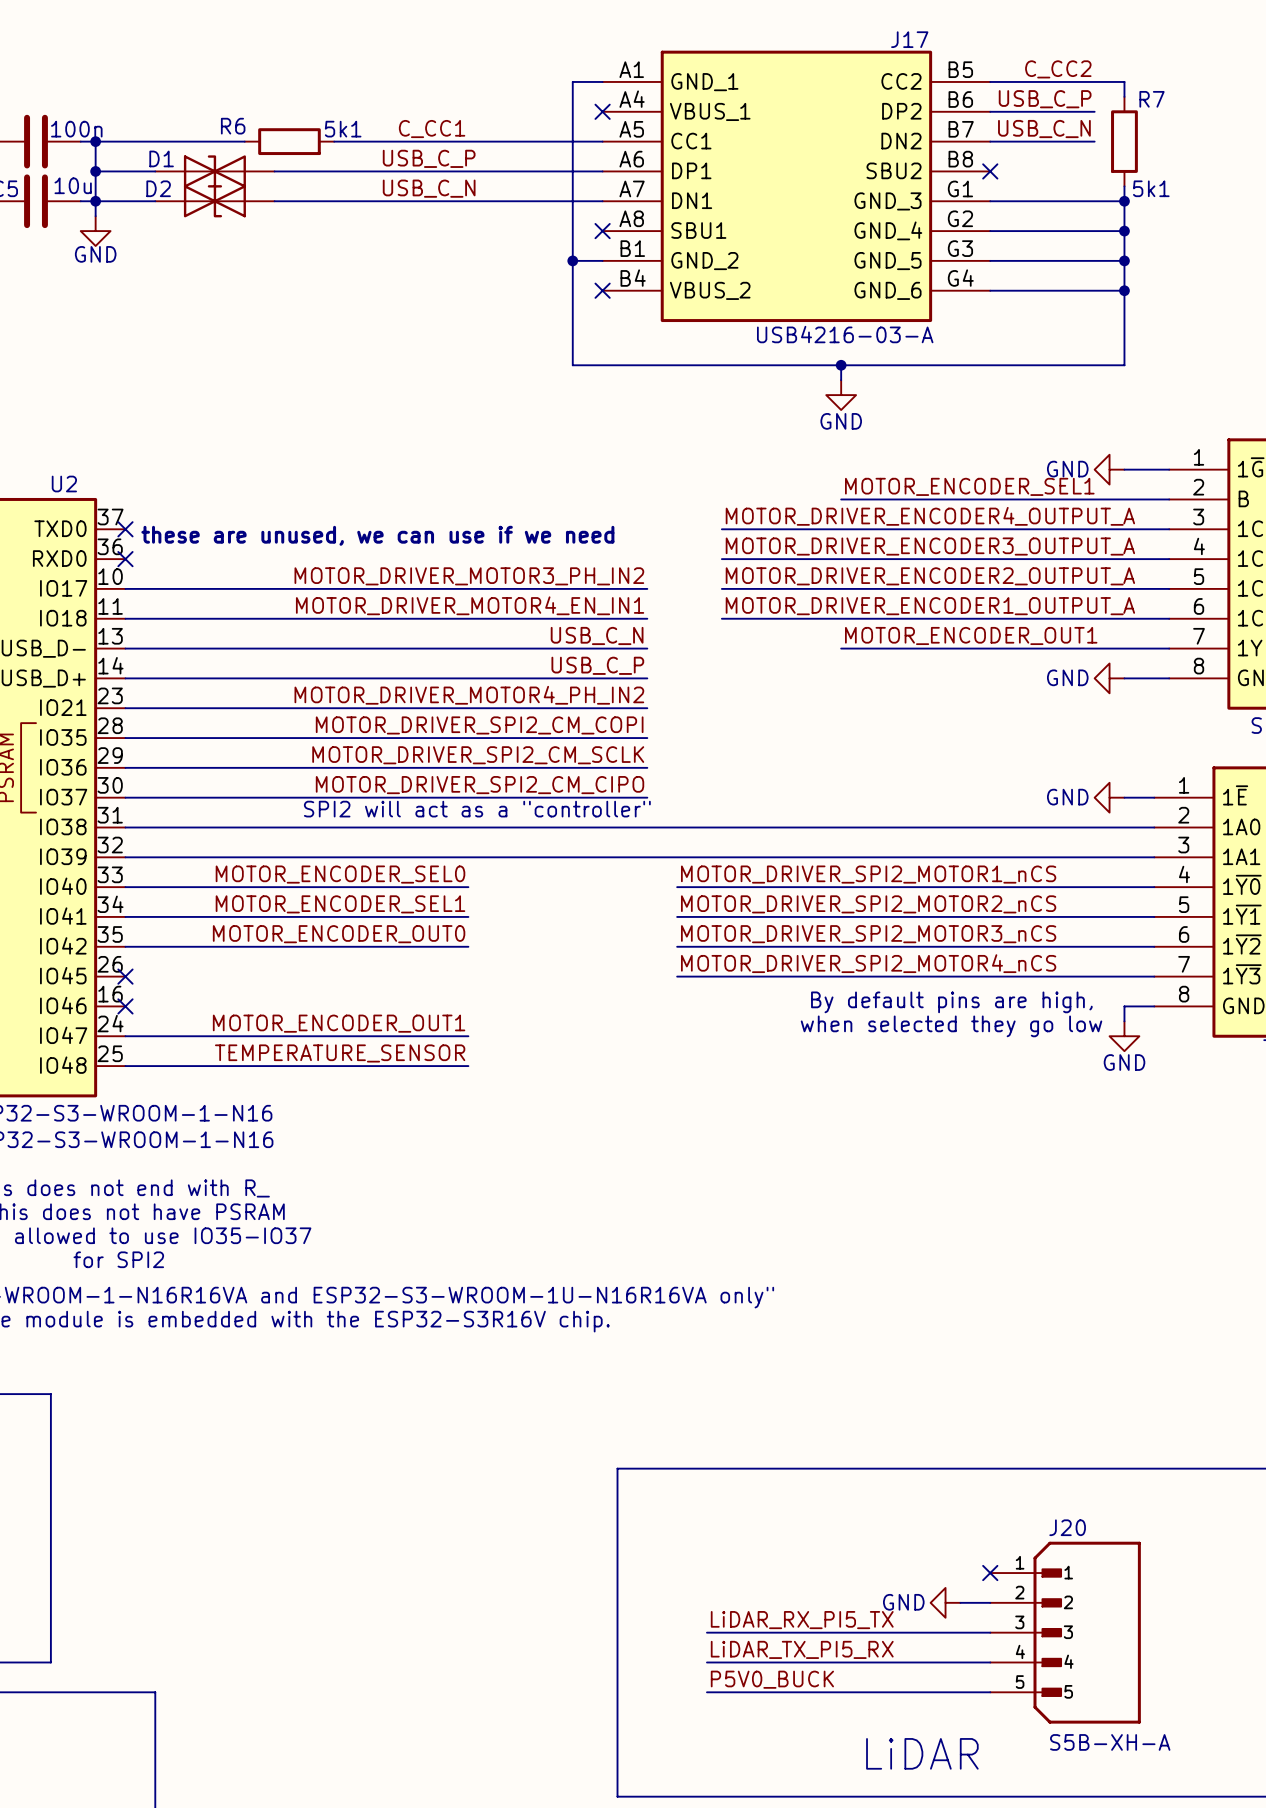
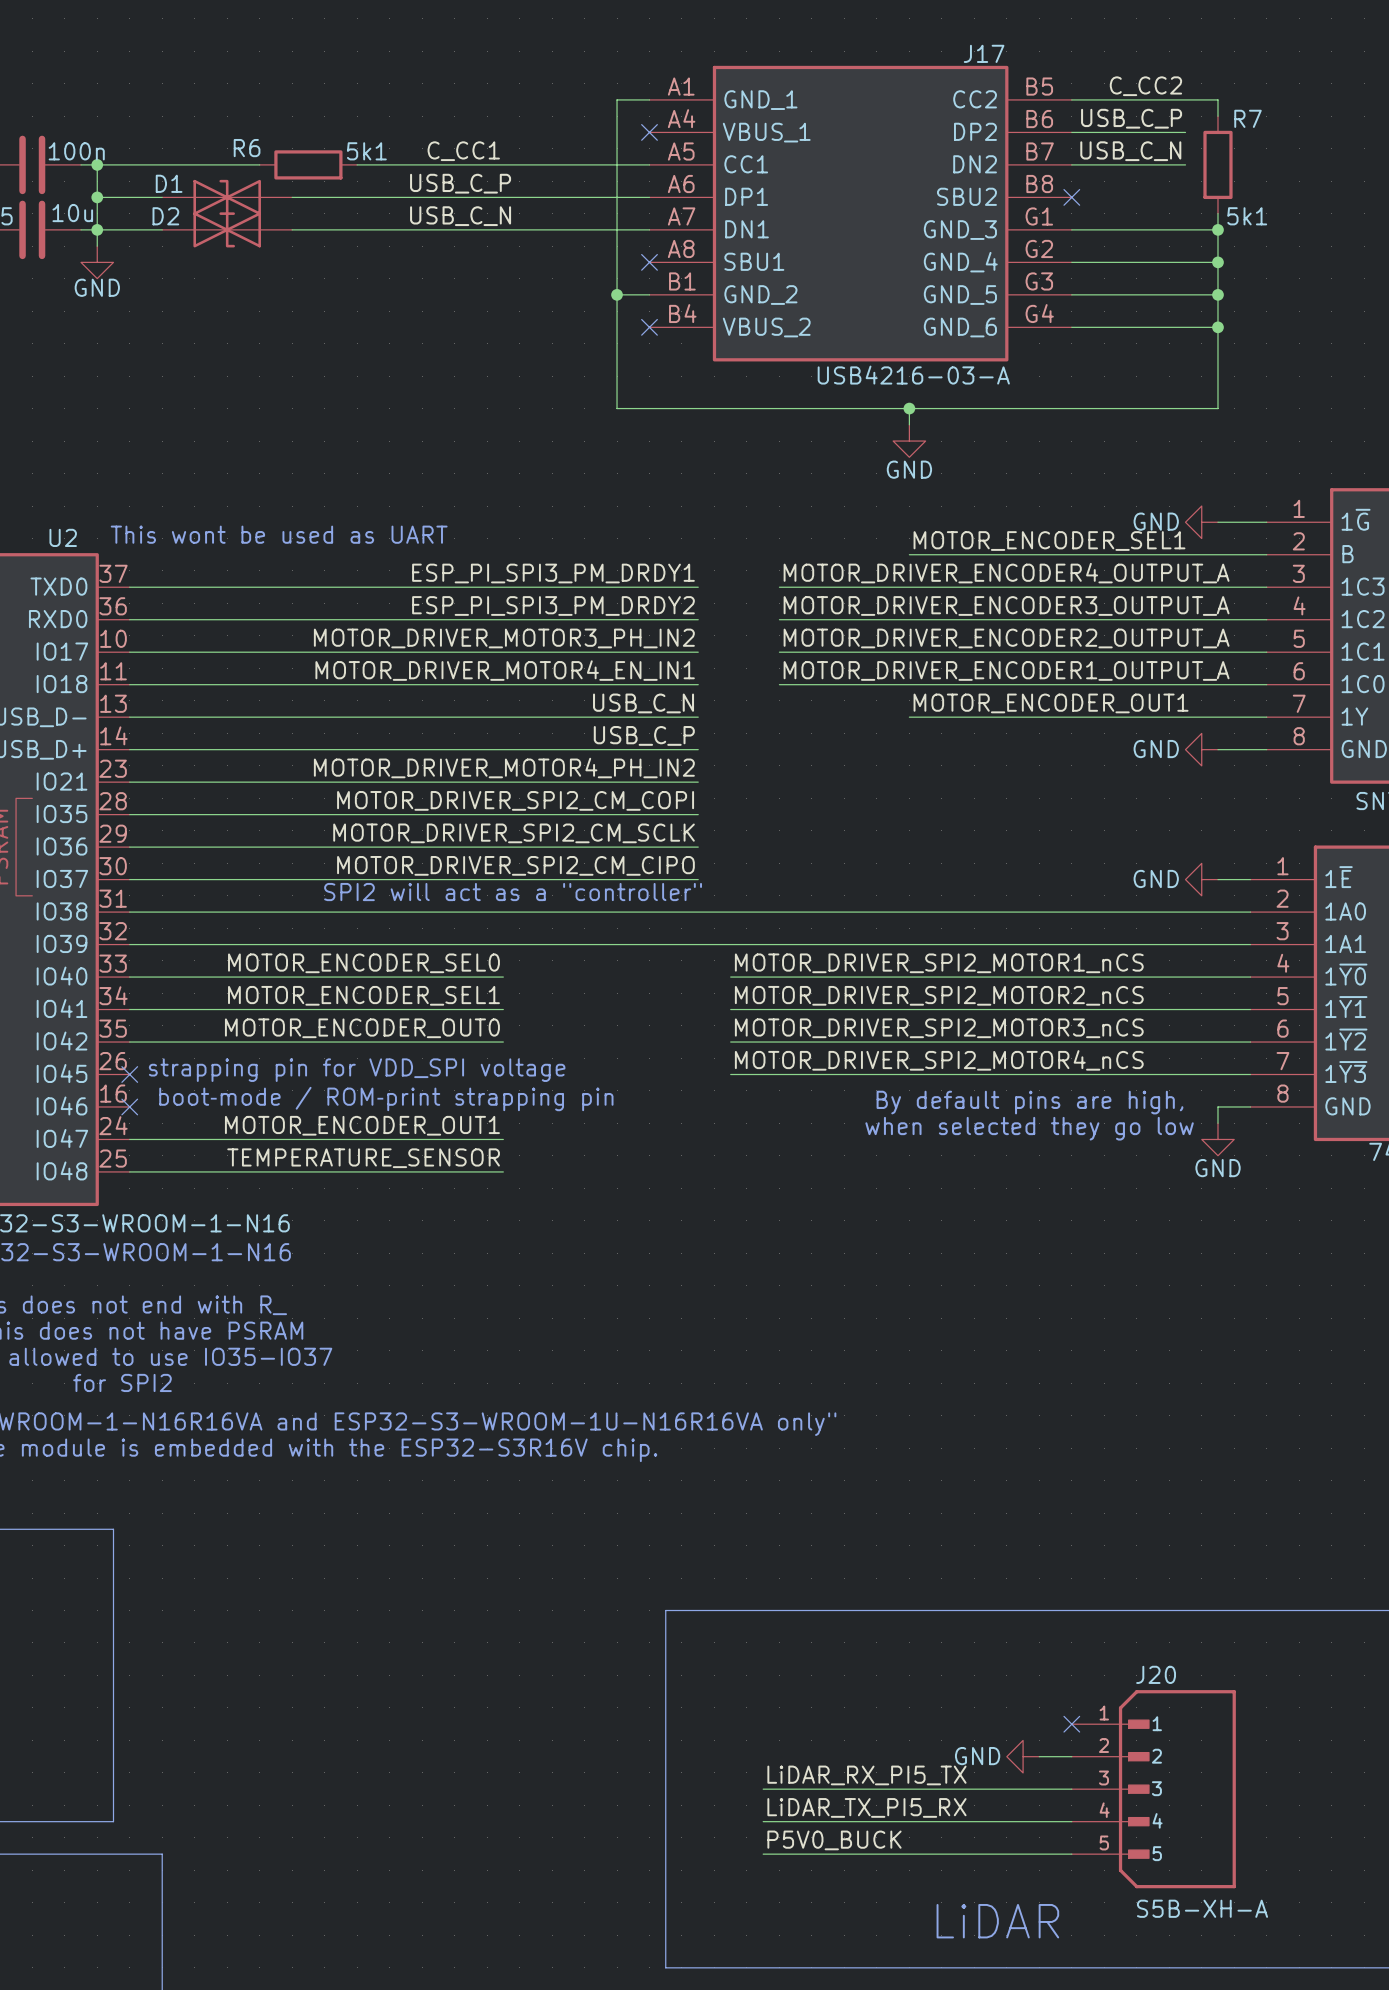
text: none -> This wont be used as UART (279, 534)
label: none -> ESP_PI_SPI3_PM_DRDY1 (553, 573)
wire: none -> (129, 587) (698, 587)
no-connect mark: (125, 529) -> none
text: these are unused, we can use if we need (377, 535) -> none
label: none -> ESP_PI_SPI3_PM_DRDY2 (553, 605)
wire: none -> (129, 619) (698, 619)
no-connect mark: (125, 559) -> none
text: none -> strapping pin for VDD_SPI voltage (357, 1070)
text: none -> boot‑mode / ROM‑print strapping pin (386, 1099)
line: (50, 1394) (50, 1662) -> (48, 1529) (113, 1529) (113, 1821) (48, 1821)

